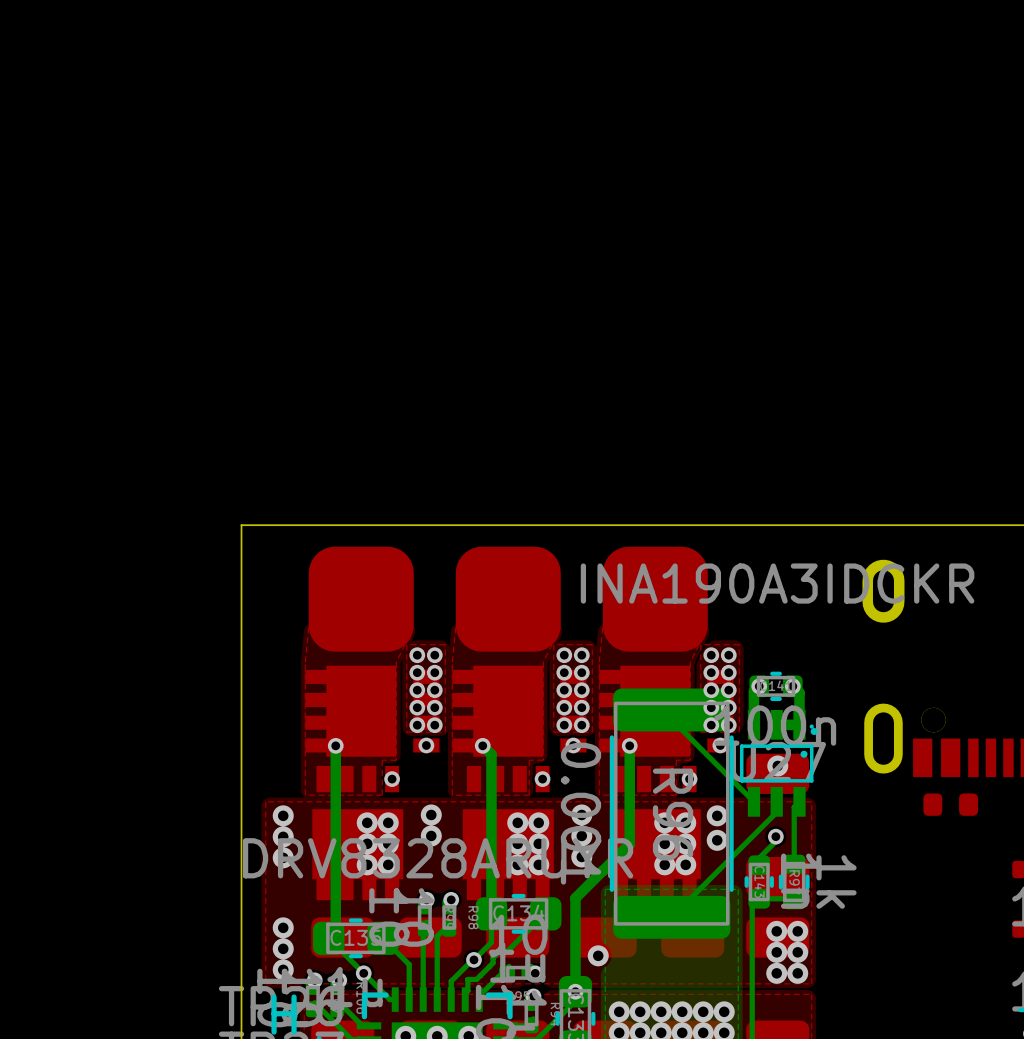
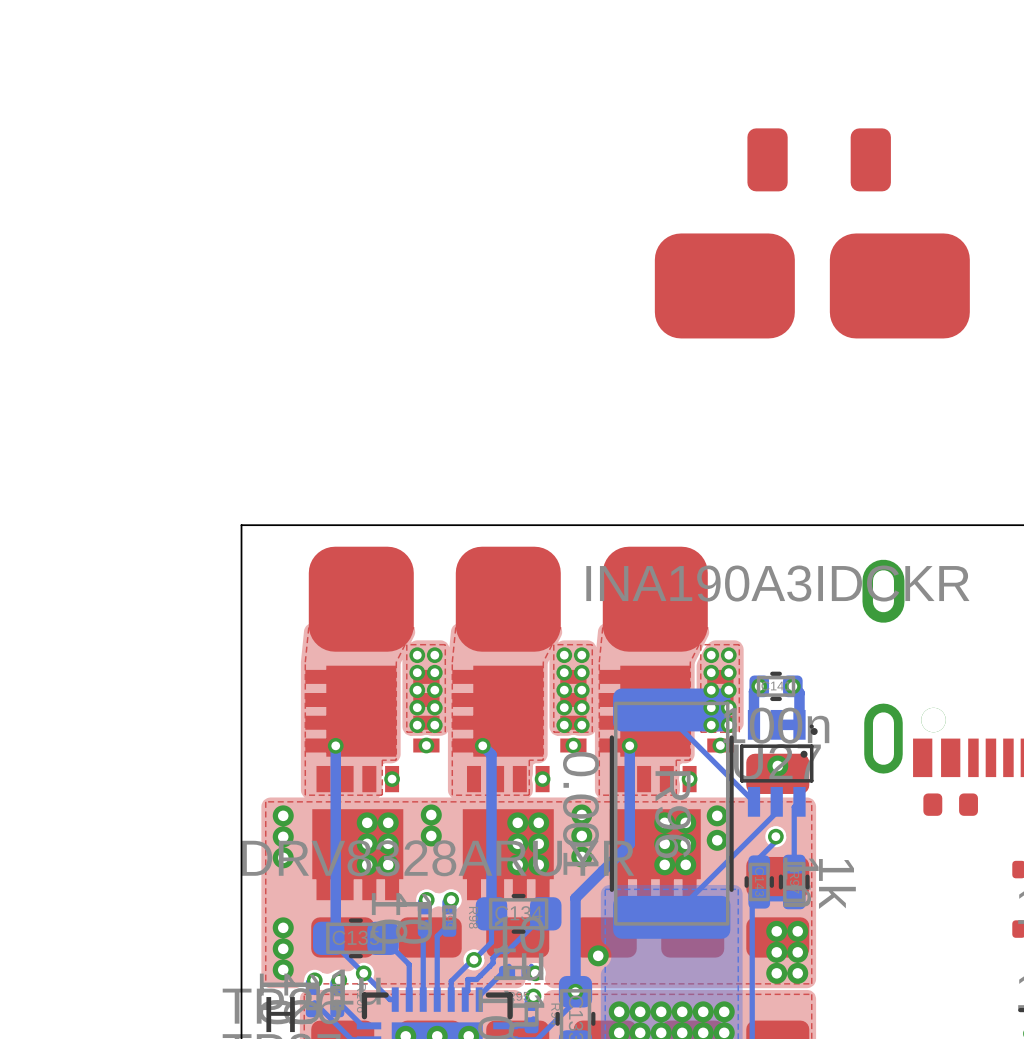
part: none -> (819, 159)
part: none -> (724, 285)
part: none -> (899, 285)

